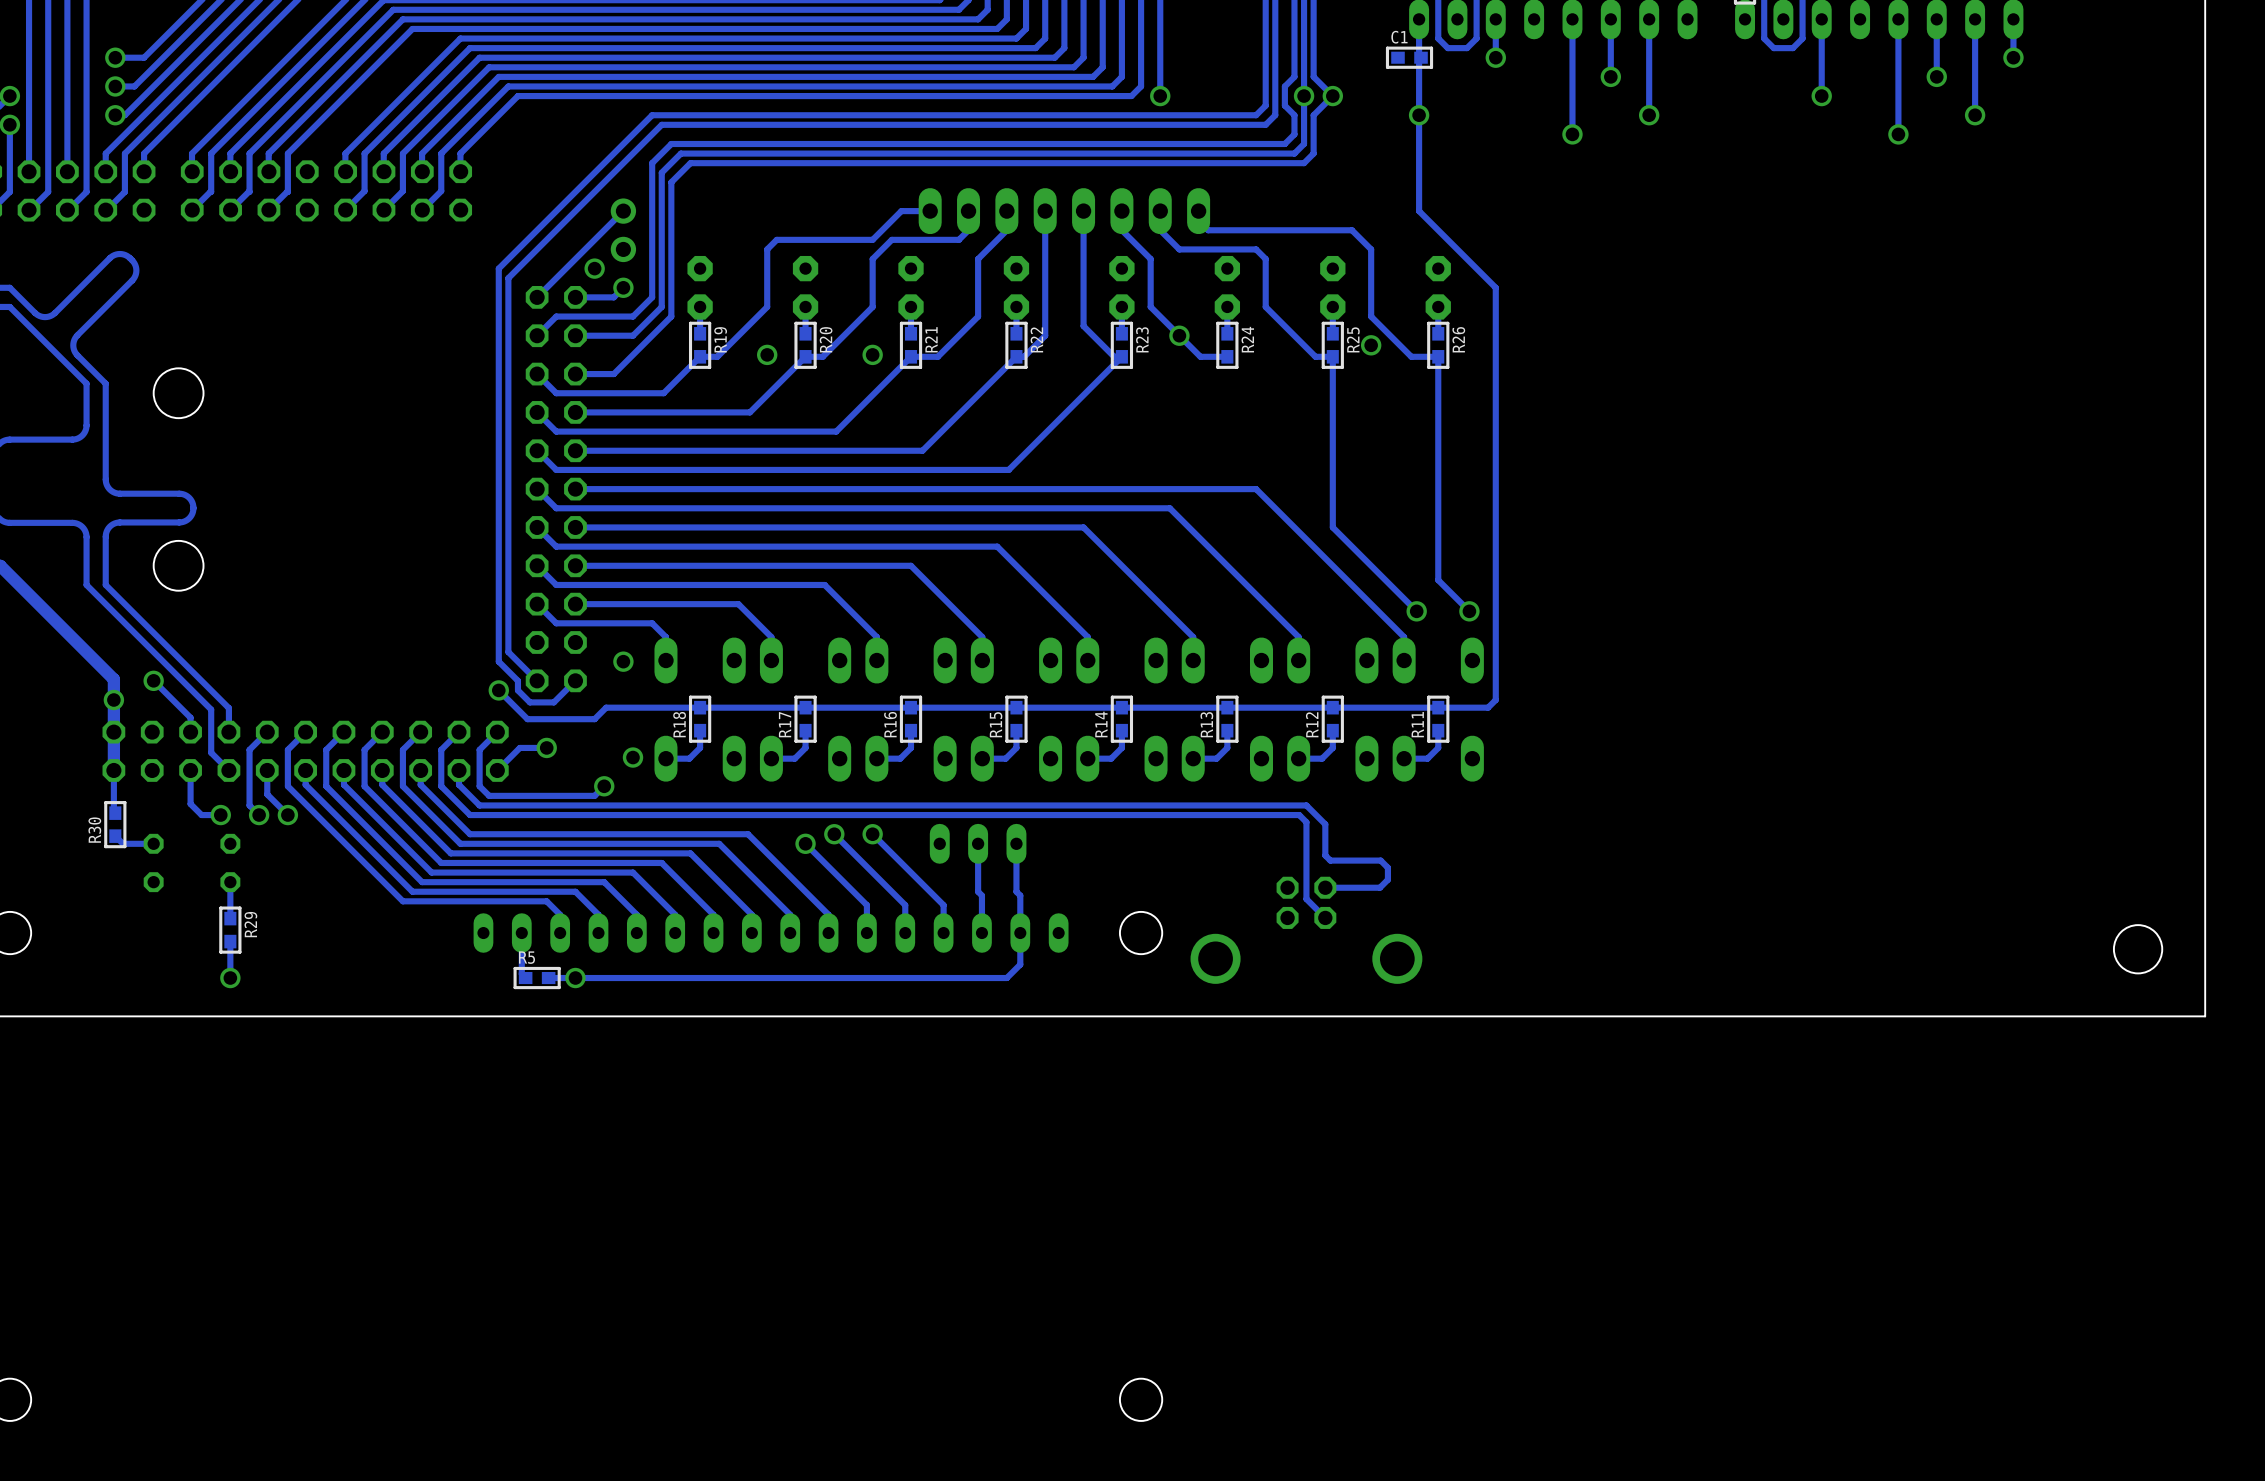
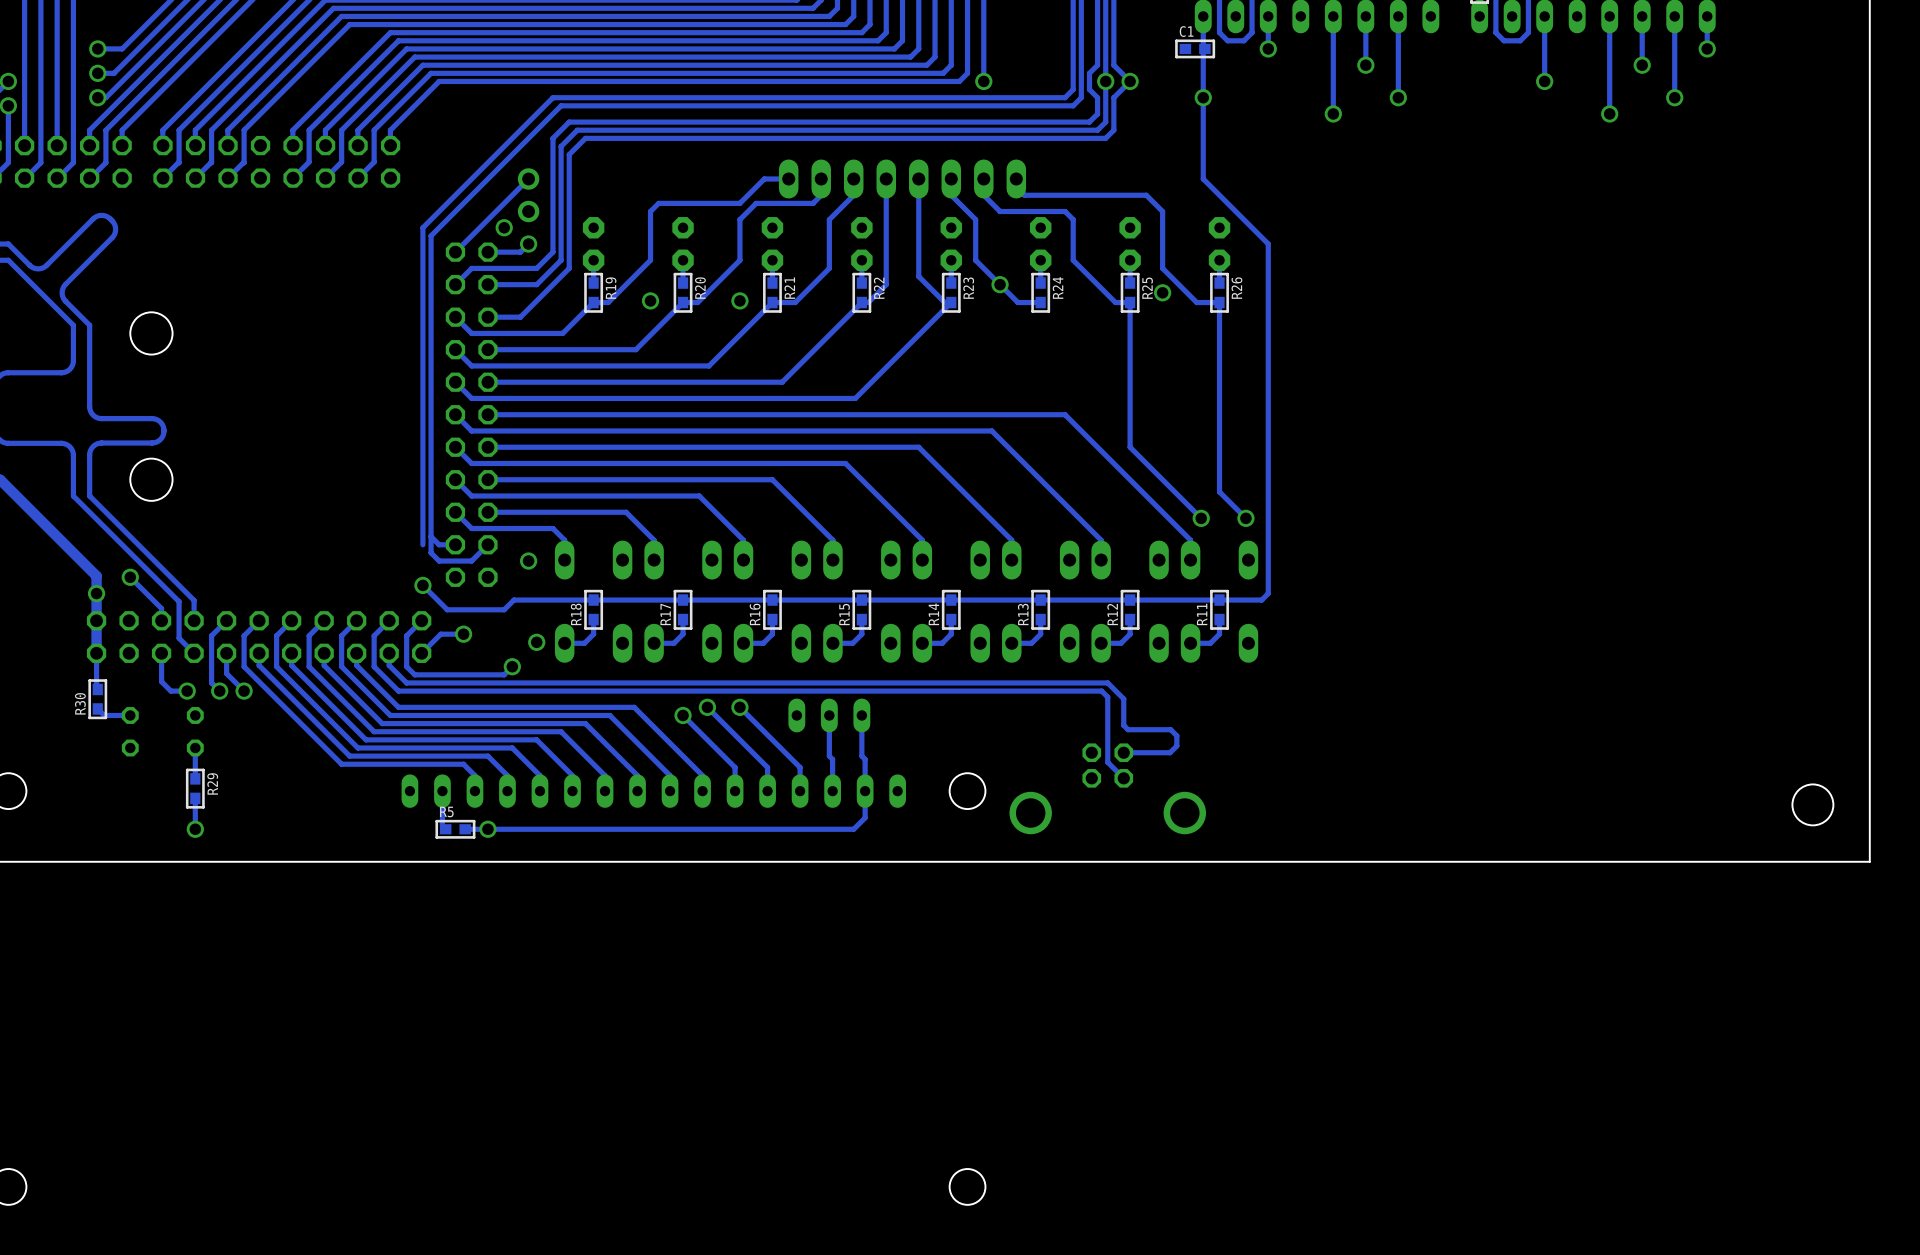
track: none -> (431, 536) (439, 544) (455, 544)
track: (498, 642) (498, 661) (517, 680) (517, 690) (529, 702) (553, 702) (575, 680) -> none
track: (517, 661) (537, 680) -> (439, 561) (471, 561) (487, 544)

